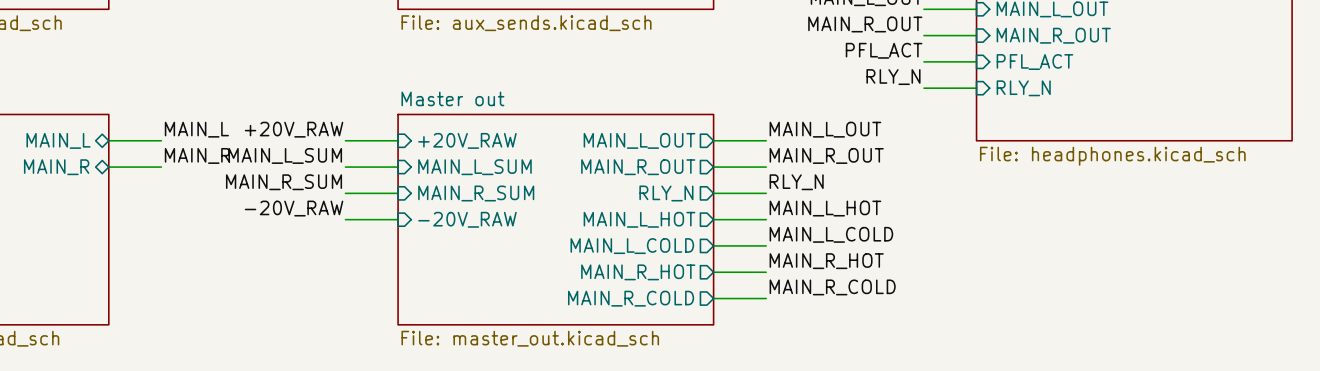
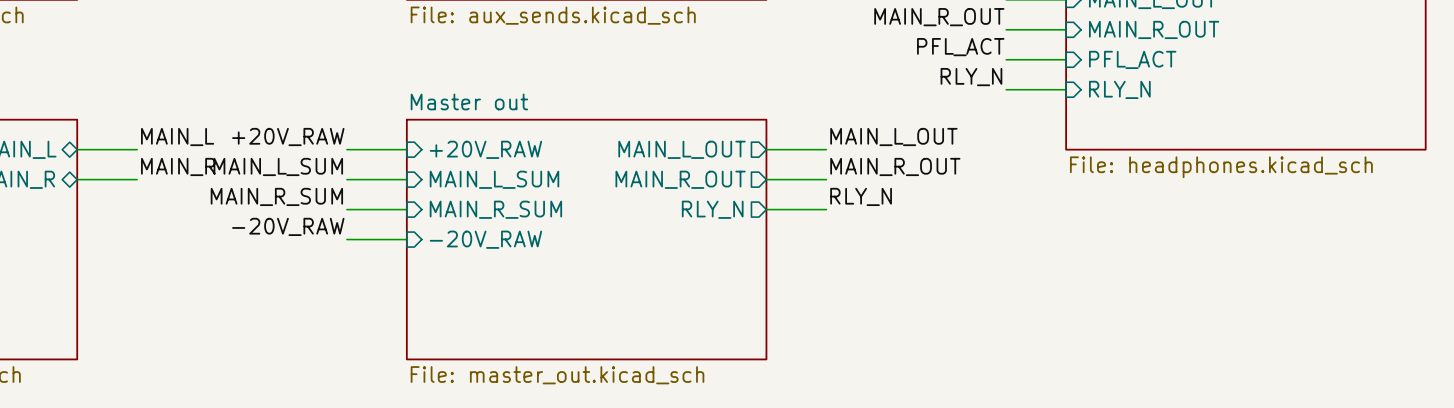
label: MAIN_L_HOT (825, 208) -> none
sheet pin: MAIN_L_HOT (639, 219) -> none
wire: (713, 219) (766, 219) -> none
label: MAIN_L_COLD (831, 234) -> none
wire: (713, 245) (766, 245) -> none
sheet pin: MAIN_L_COLD (632, 246) -> none
label: MAIN_R_HOT (826, 261) -> none
sheet pin: MAIN_R_HOT (638, 272) -> none
wire: (713, 272) (766, 272) -> none
label: MAIN_R_COLD (832, 287) -> none
sheet pin: MAIN_R_COLD (631, 298) -> none
wire: (713, 298) (766, 298) -> none

